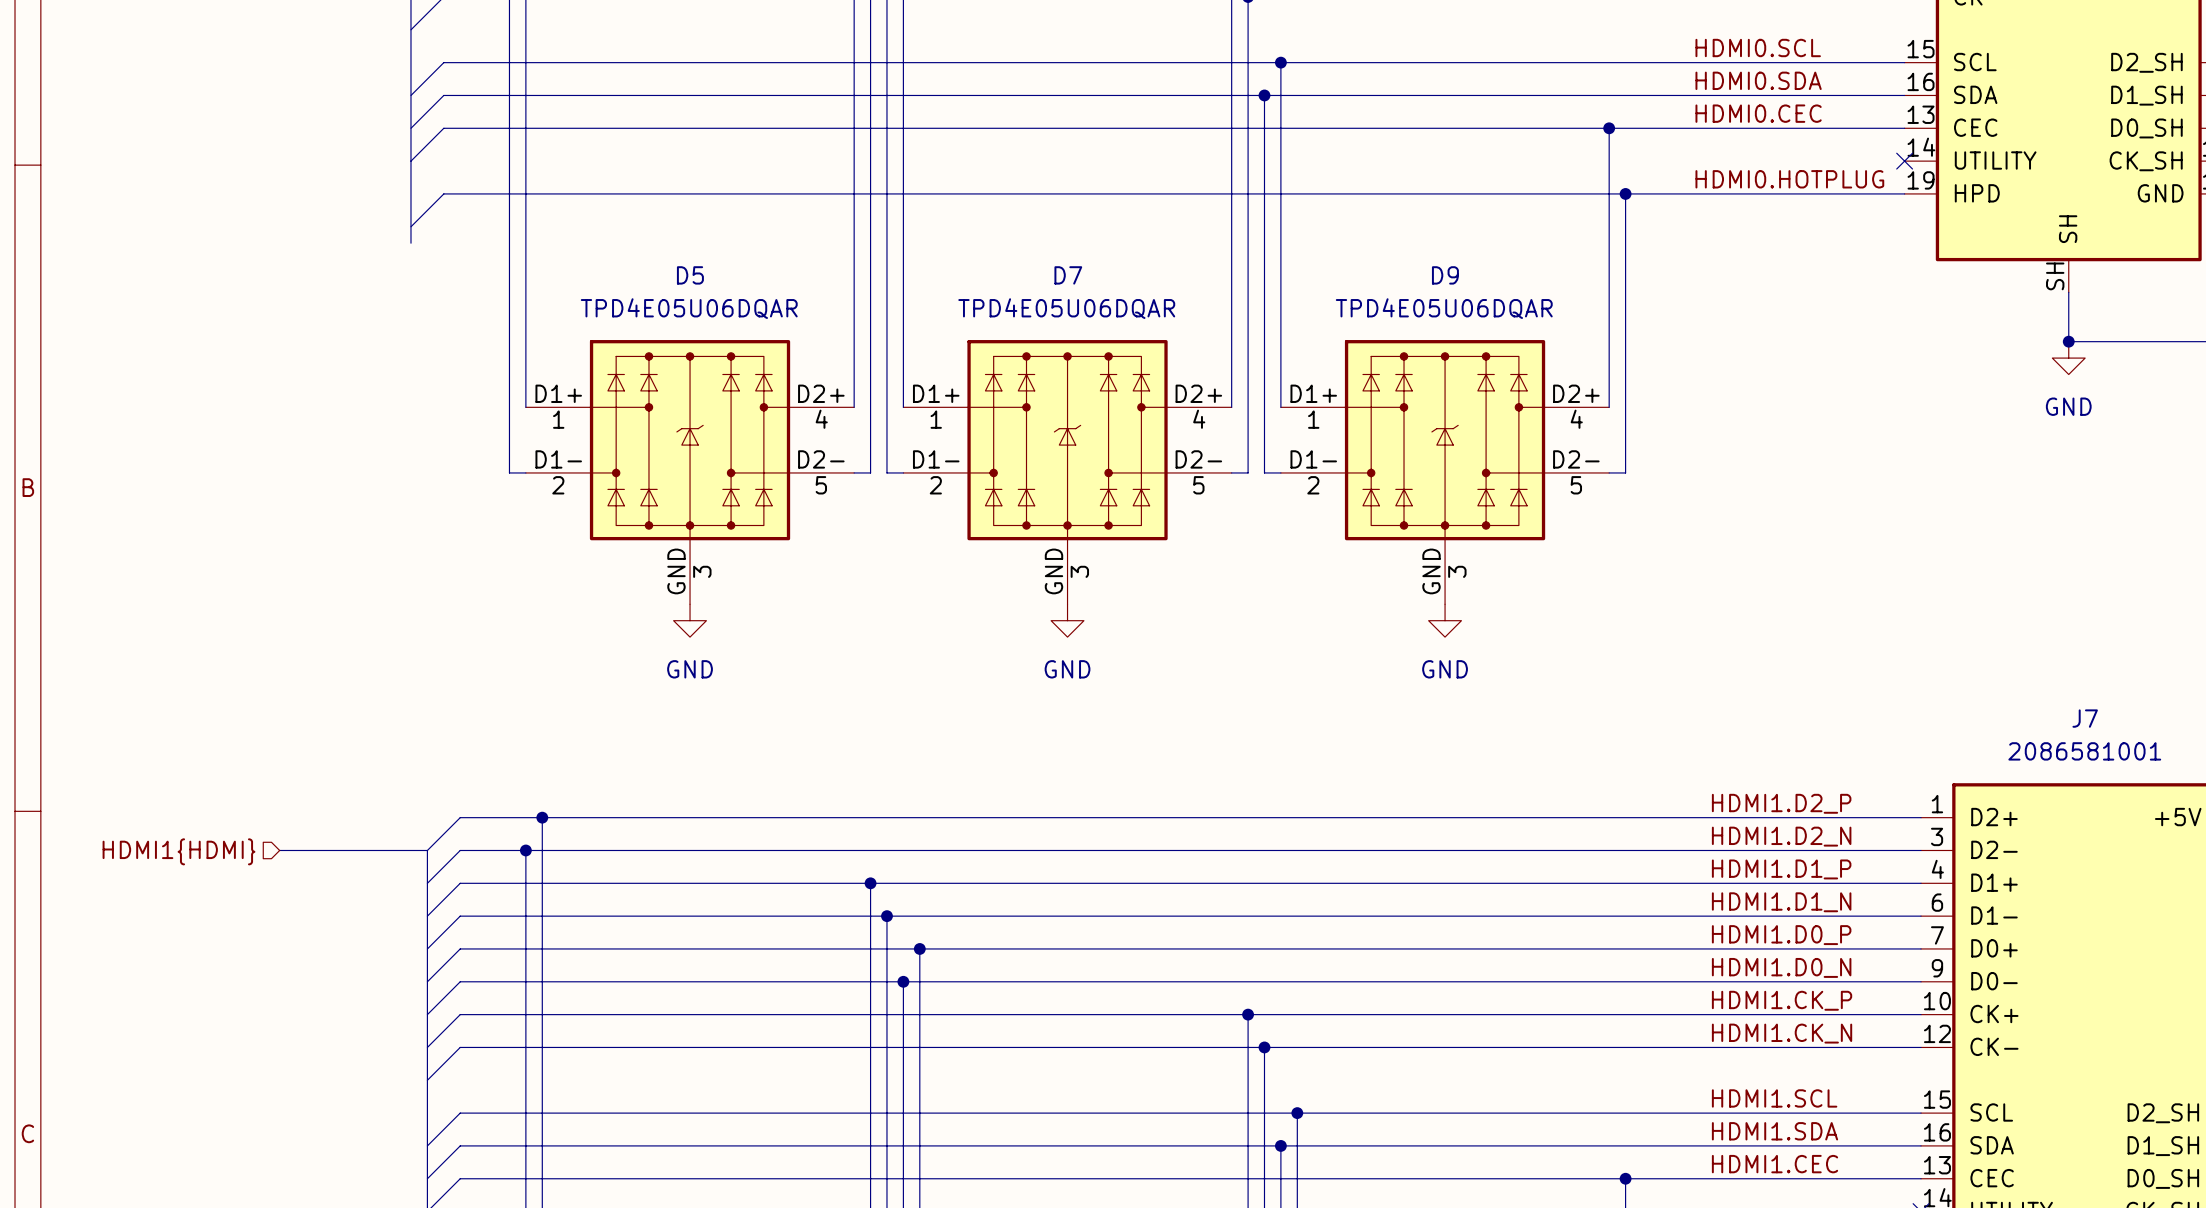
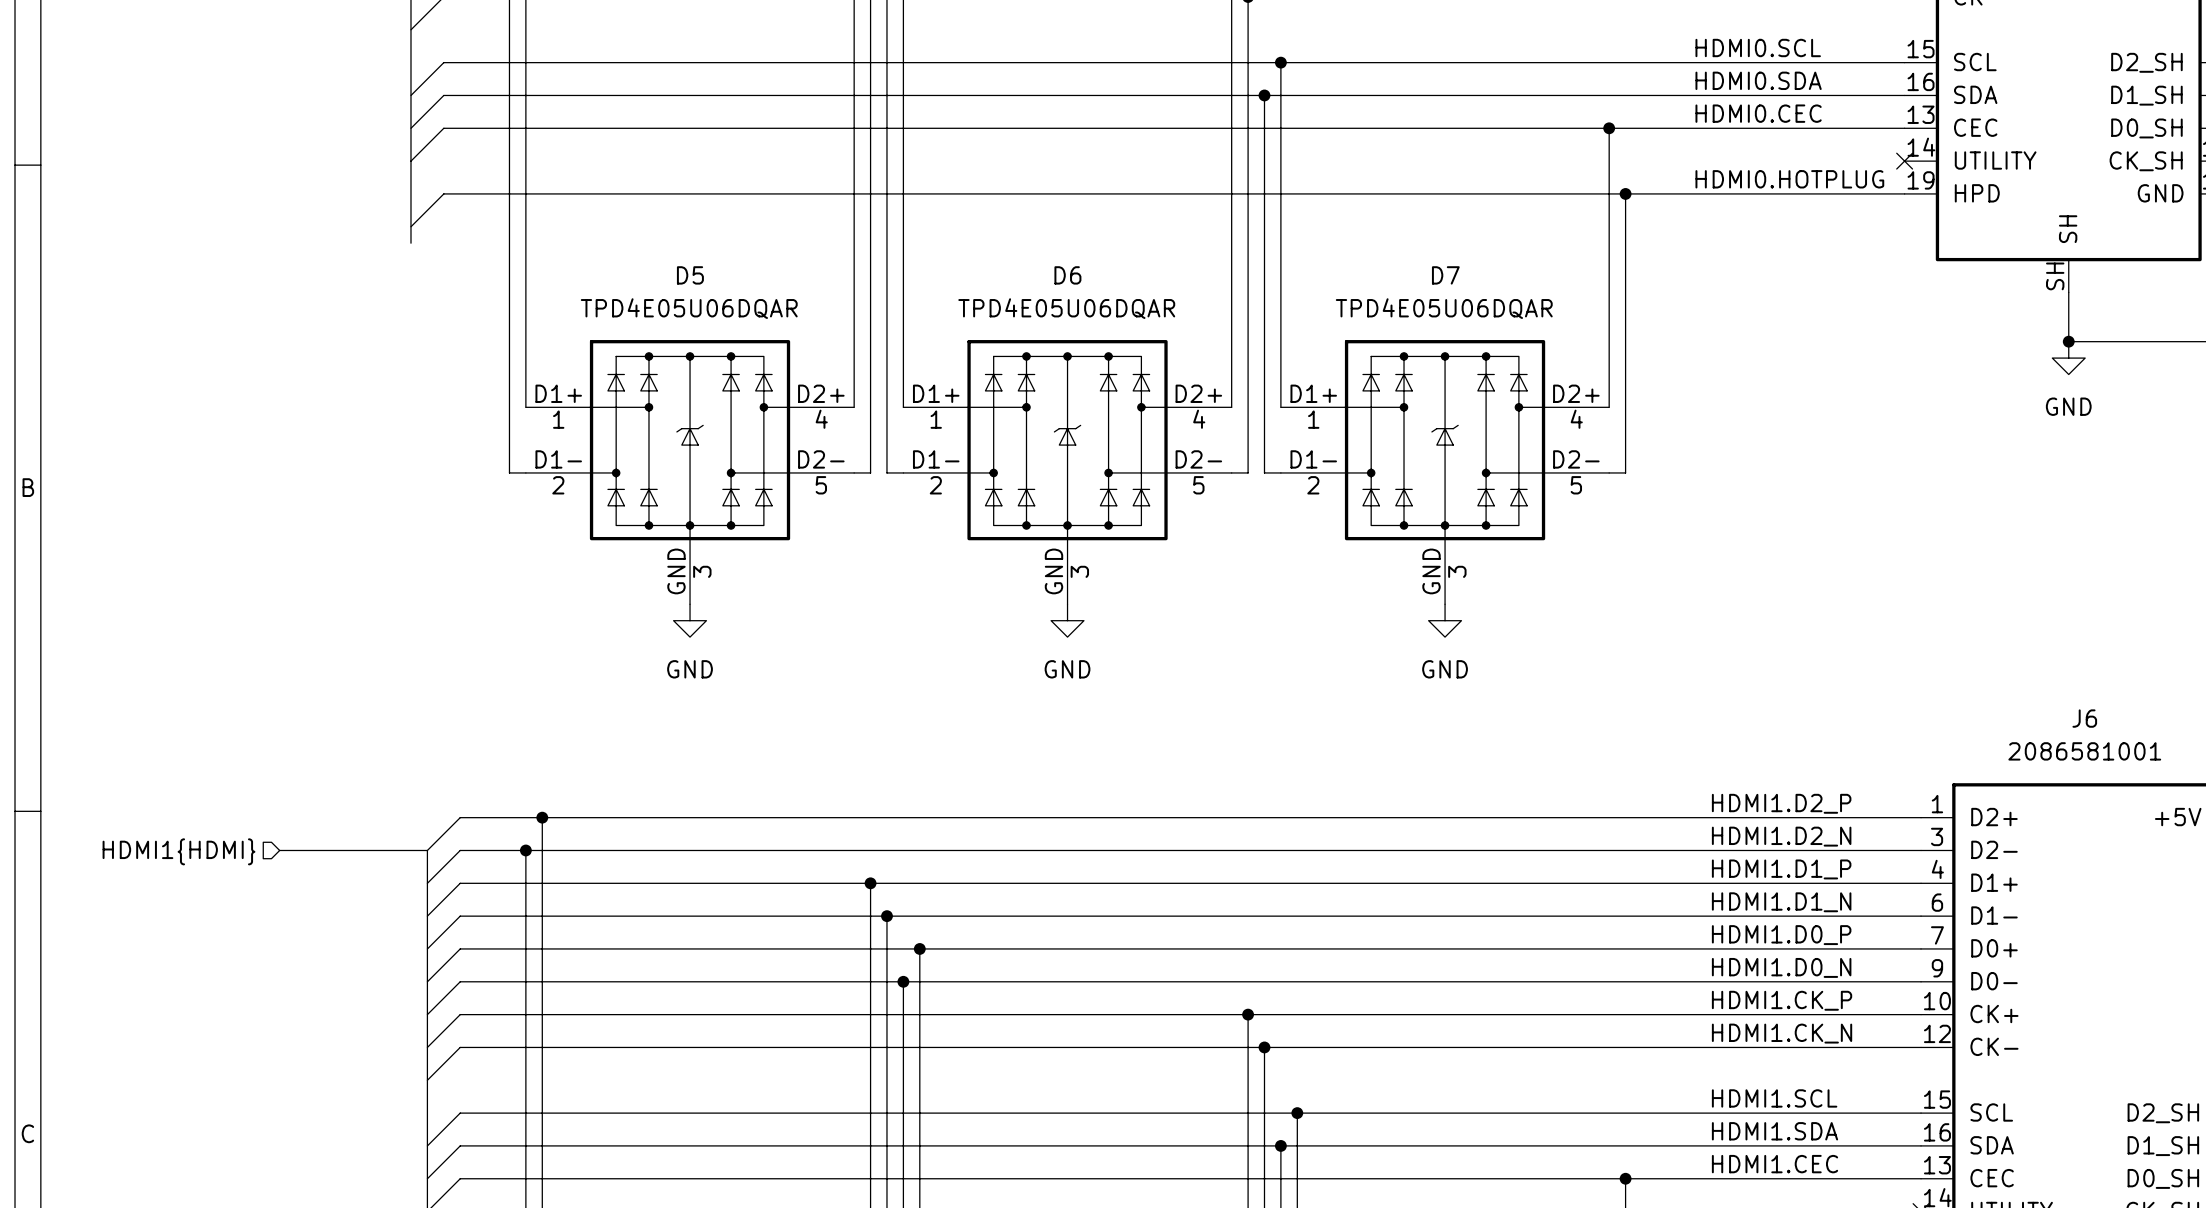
D7 name: D7 (1068, 275) -> D6 (1067, 275)
D9 name: D9 (1445, 275) -> D7 (1445, 275)
J7 name: J7 (2085, 718) -> J6 (2084, 718)

